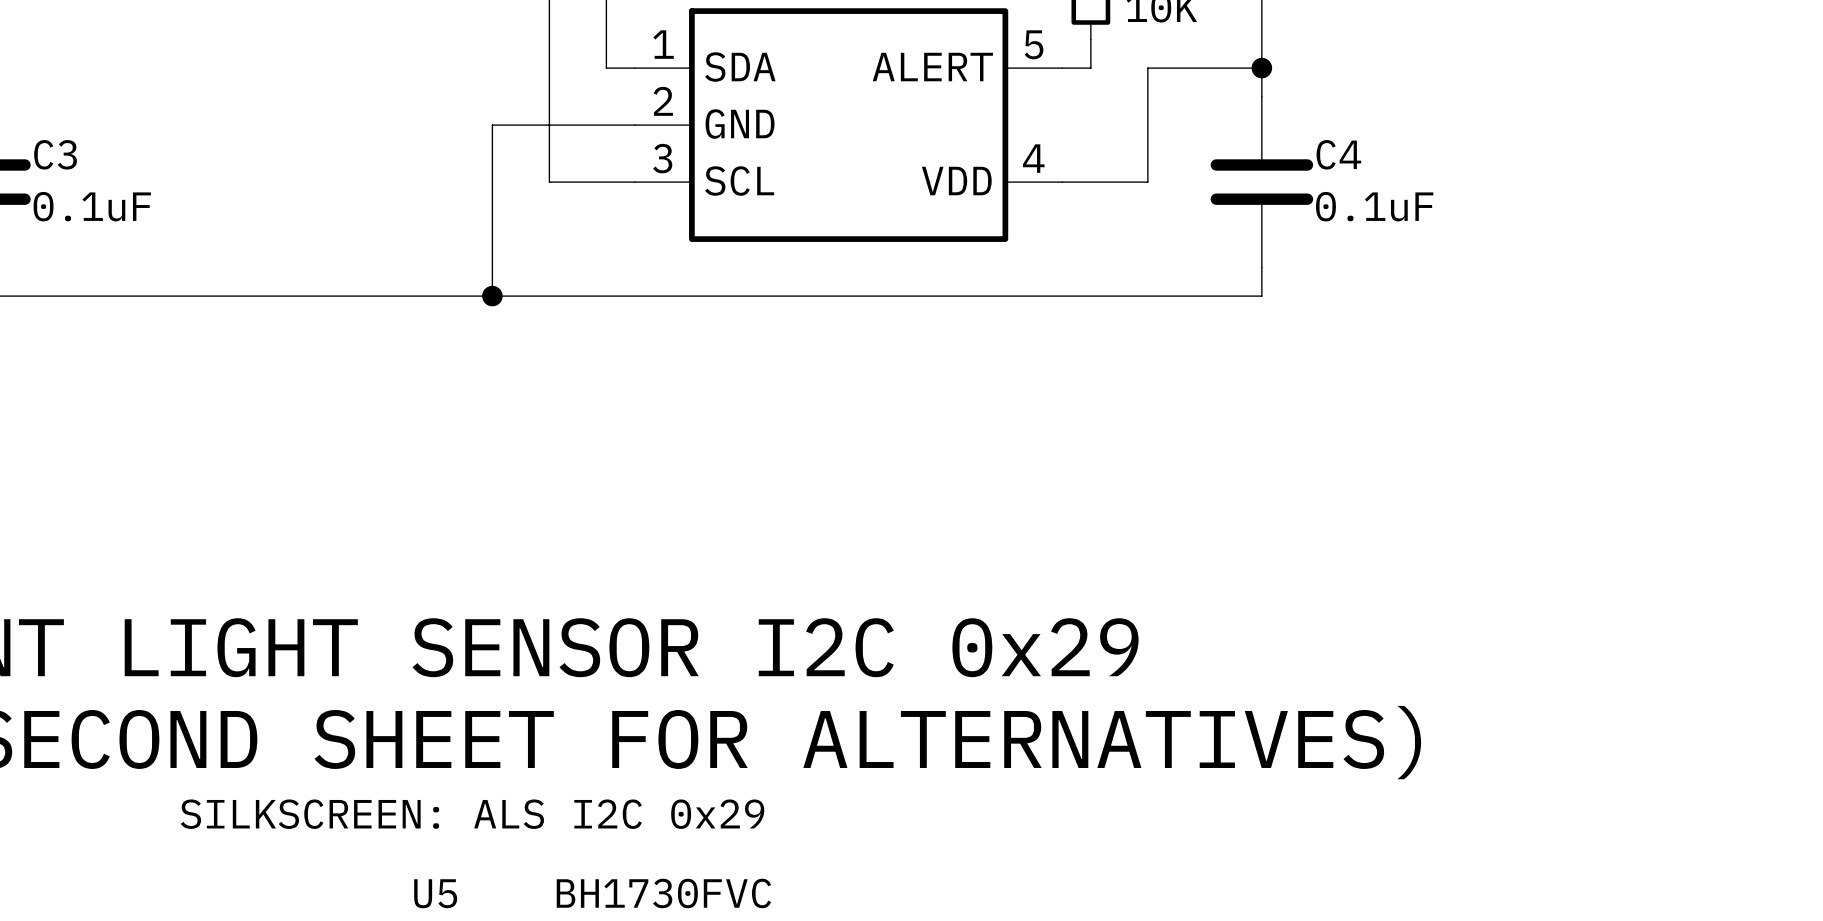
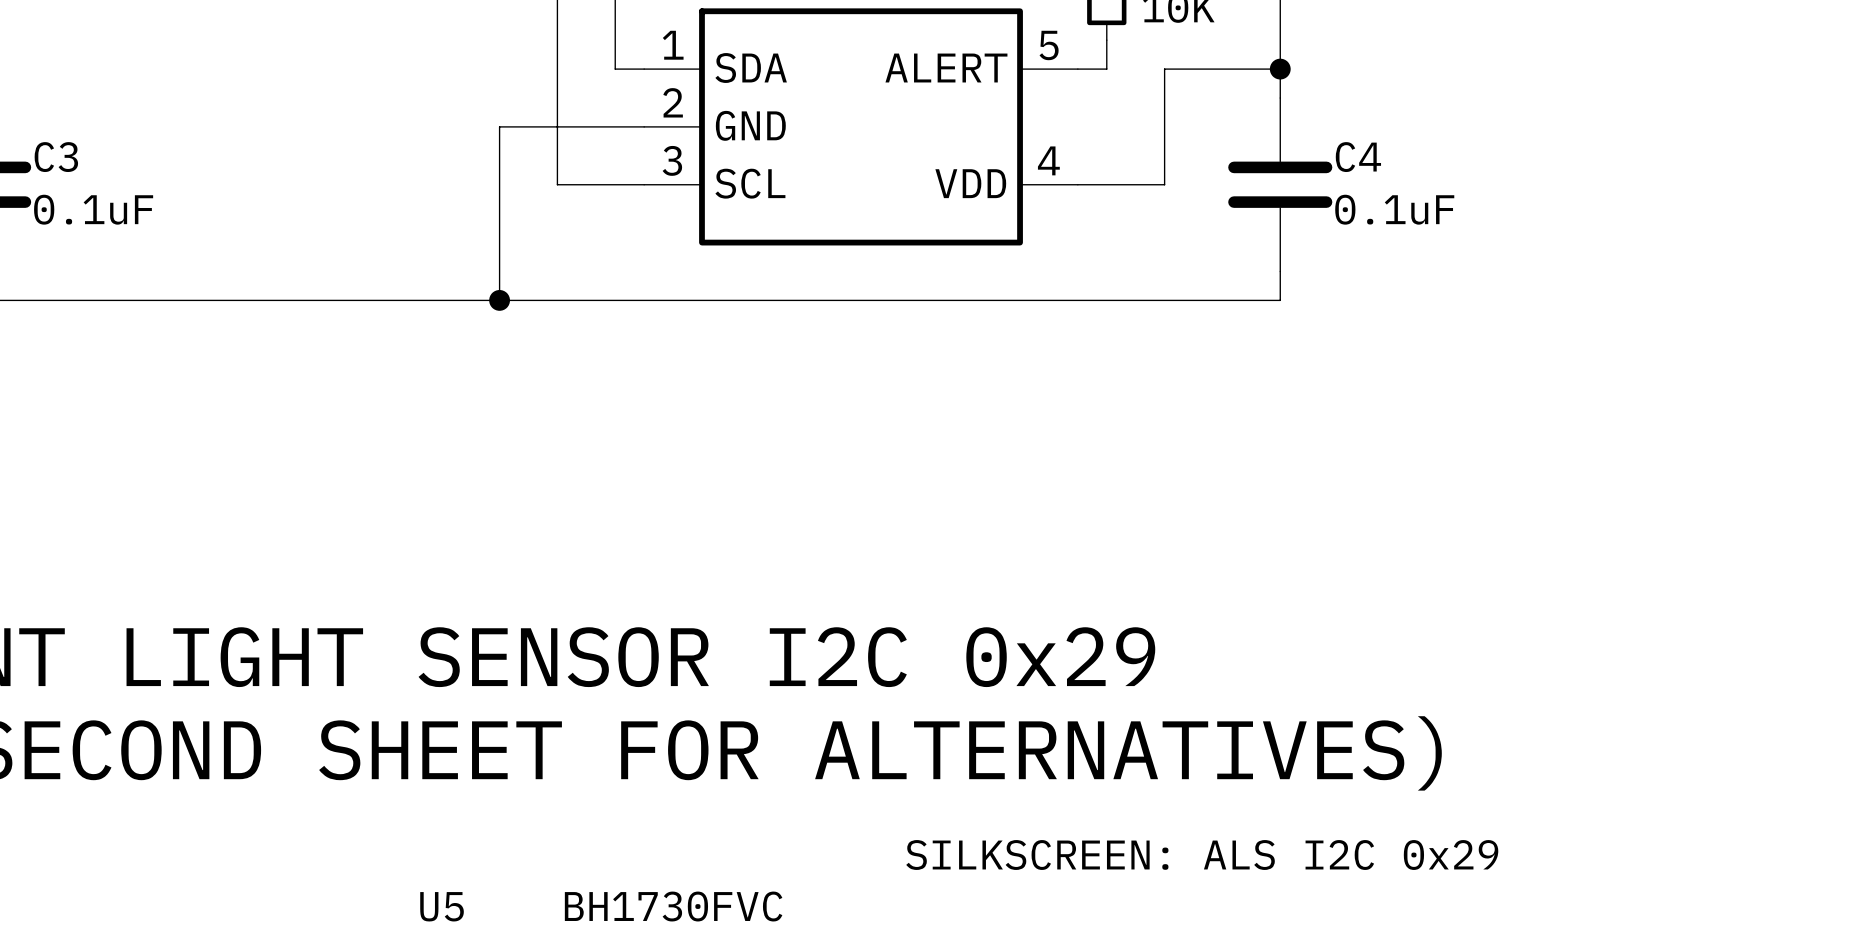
text: SILKSCREEN: ALS I2C 0x29 (472, 814) -> none
text: none -> SILKSCREEN: ALS I2C 0x29 (1202, 855)

